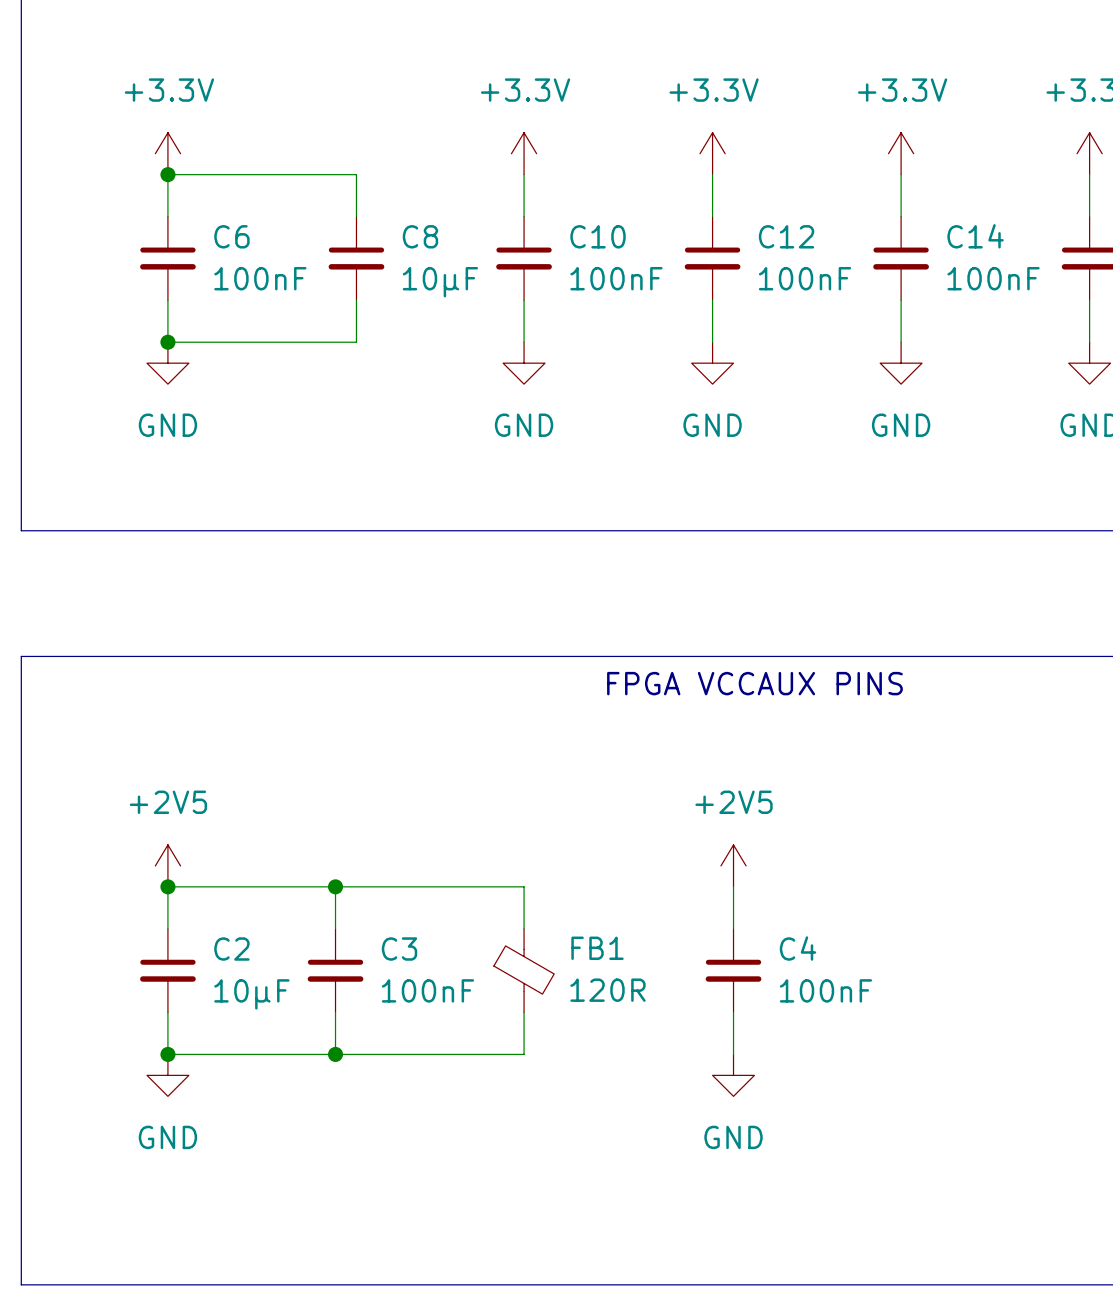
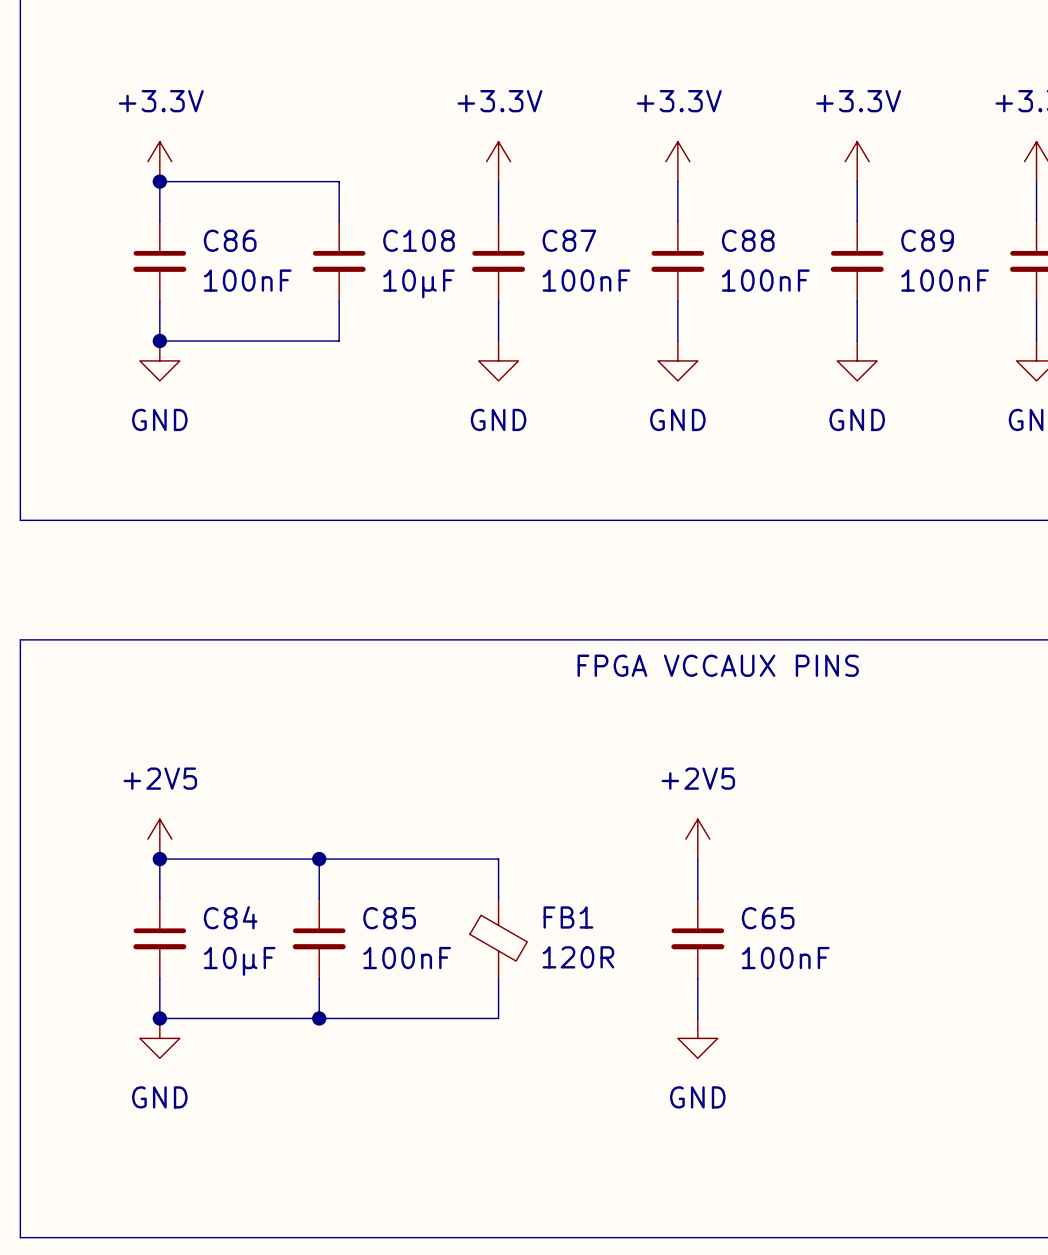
C6 name: C6 (231, 236) -> C86 (230, 240)
C8 name: C8 (420, 236) -> C108 (419, 240)
C10 name: C10 (598, 236) -> C87 (569, 240)
C12 name: C12 (786, 236) -> C88 (748, 240)
C14 name: C14 (975, 236) -> C89 (927, 240)
C4 name: C4 (798, 948) -> C65 (768, 918)
C2 name: C2 (231, 949) -> C84 (230, 917)
C3 name: C3 (399, 949) -> C85 (389, 918)

